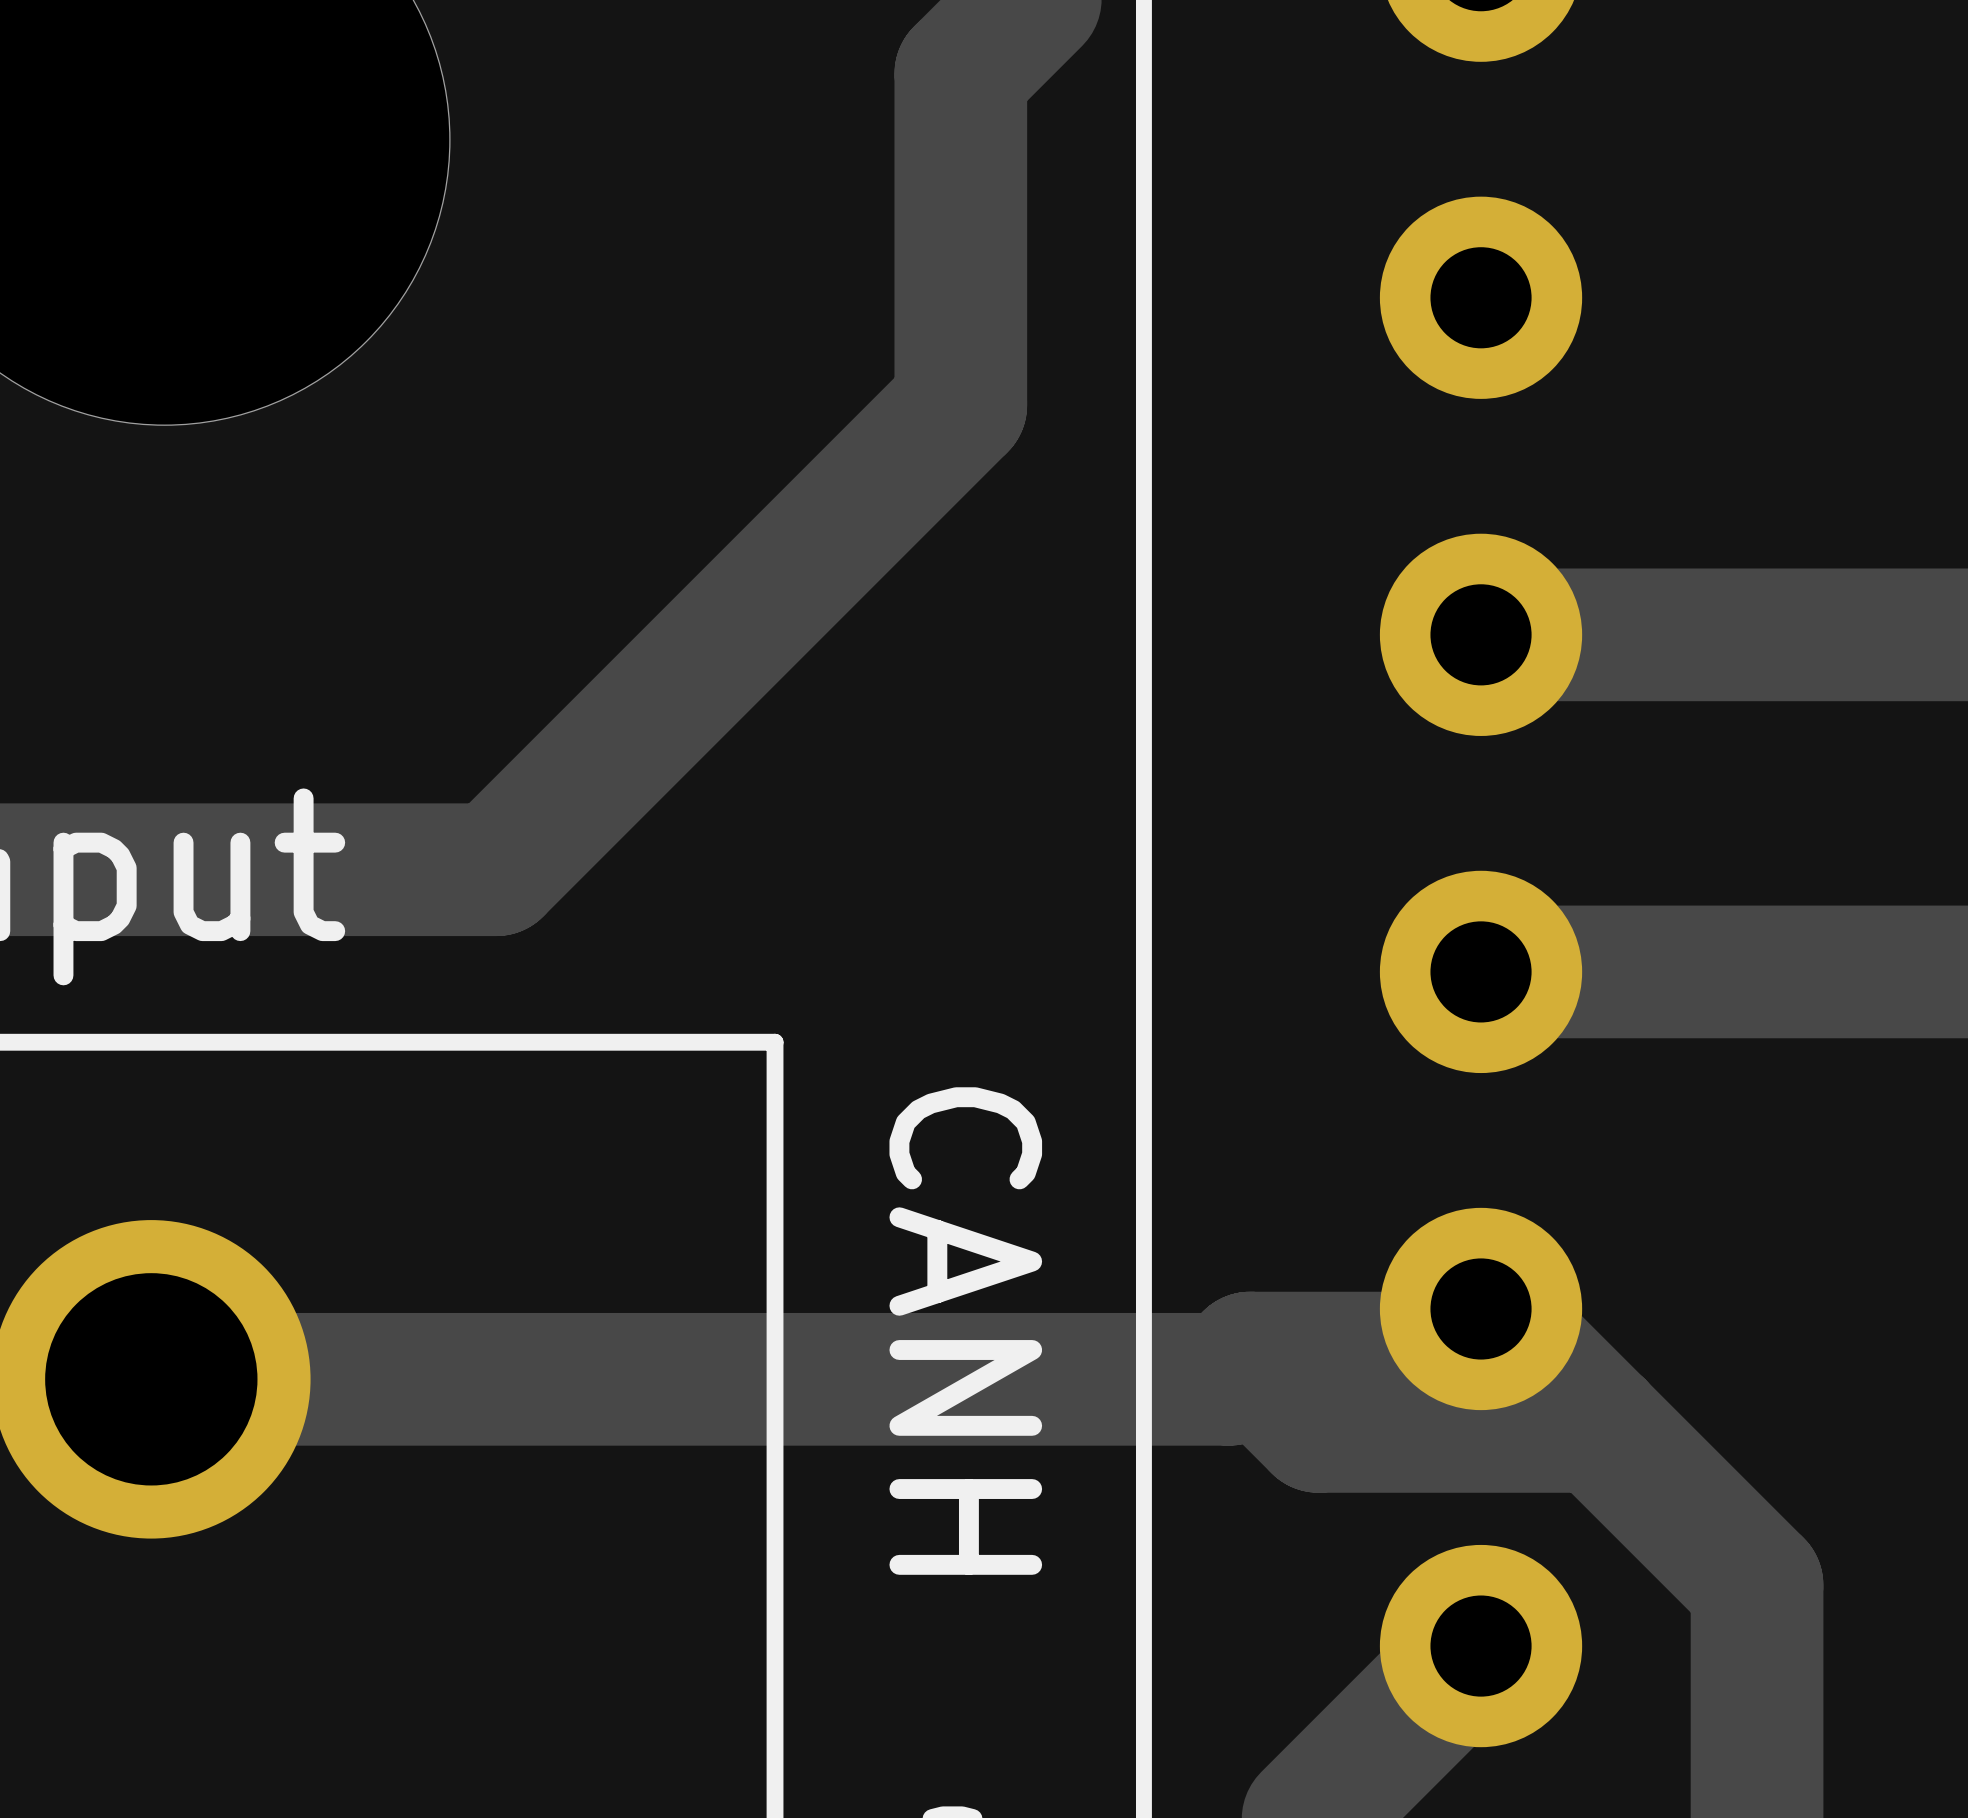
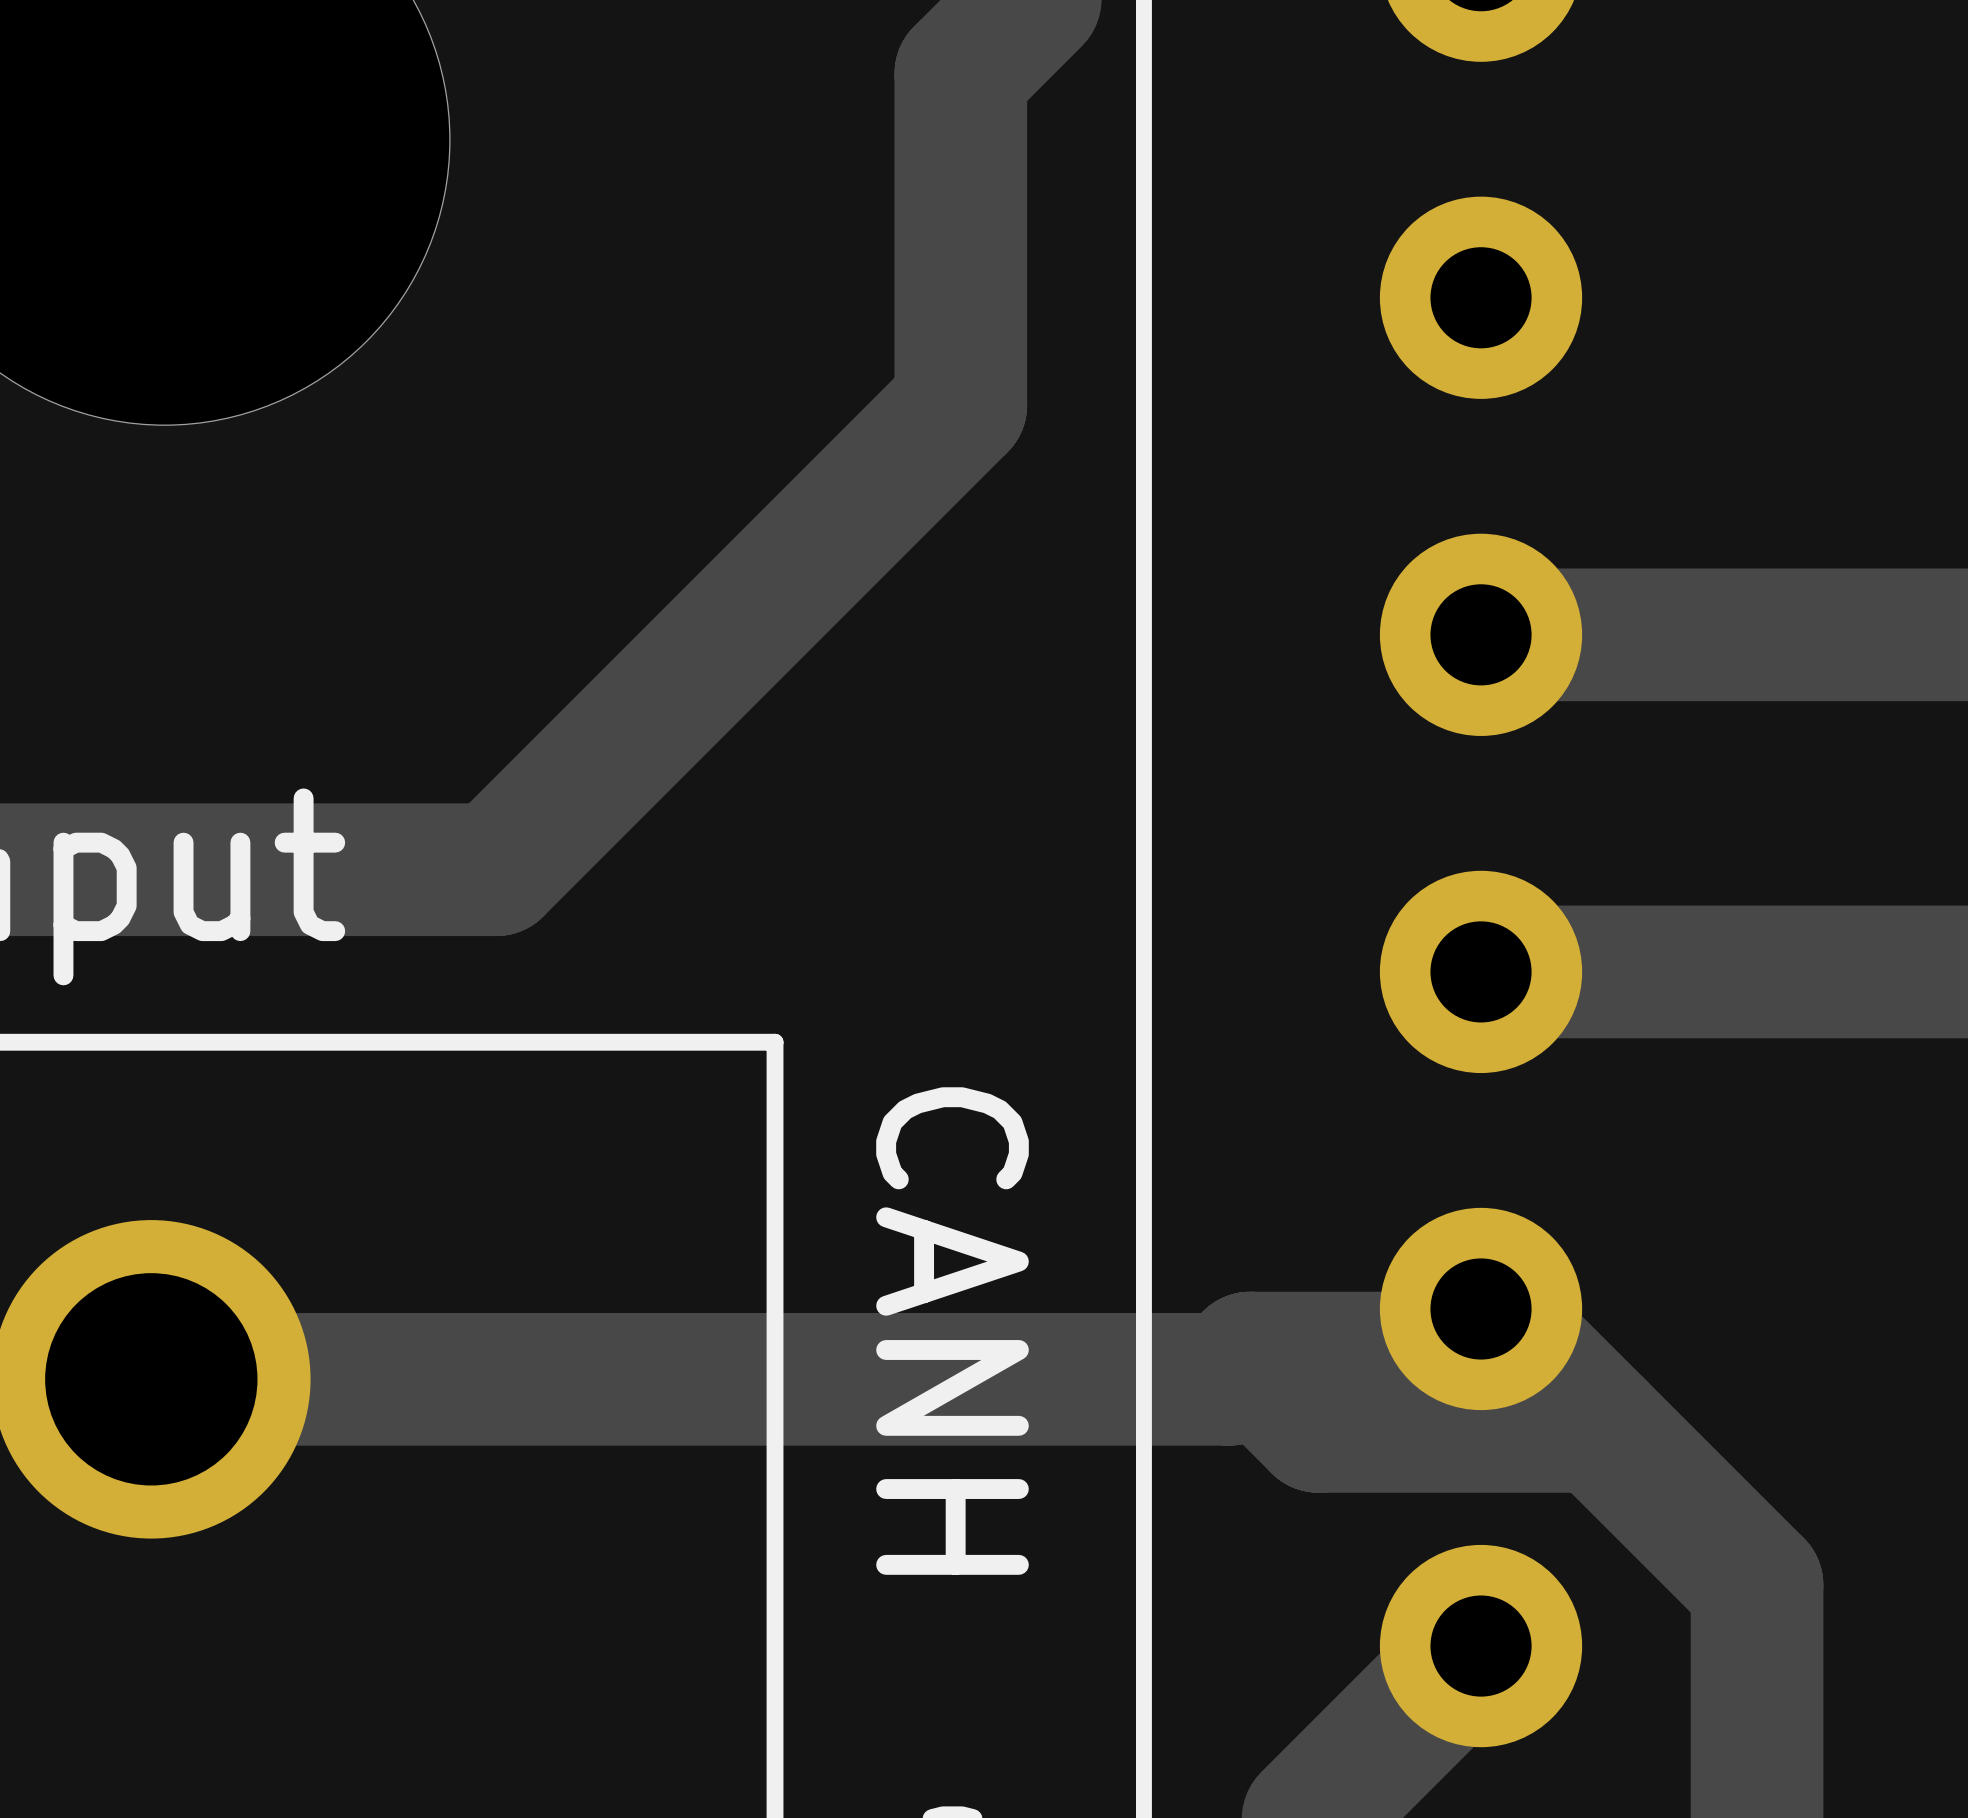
text position: CANH (965, 1331) -> CANH (952, 1331)

